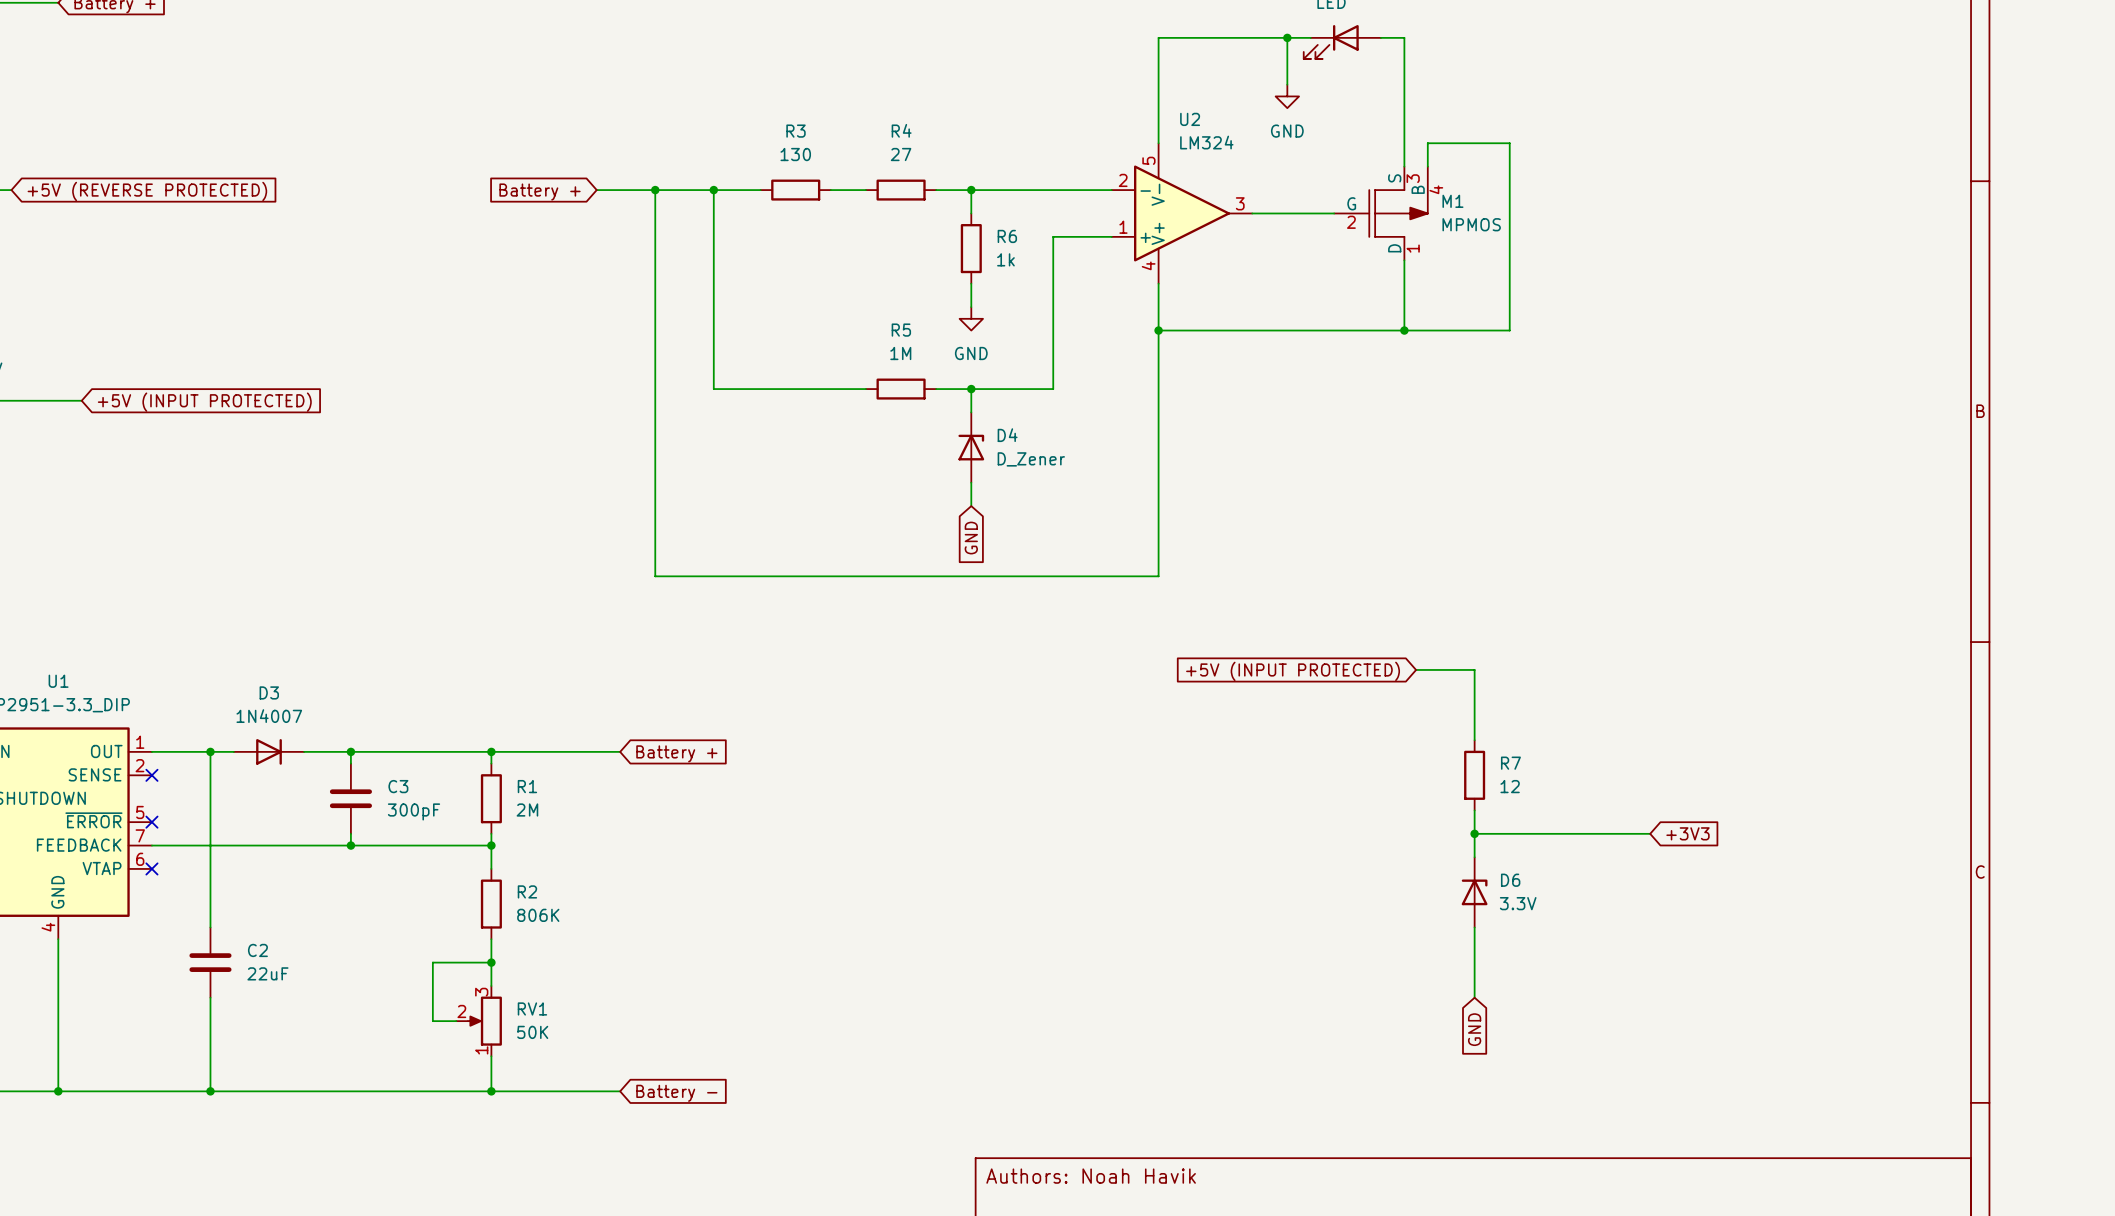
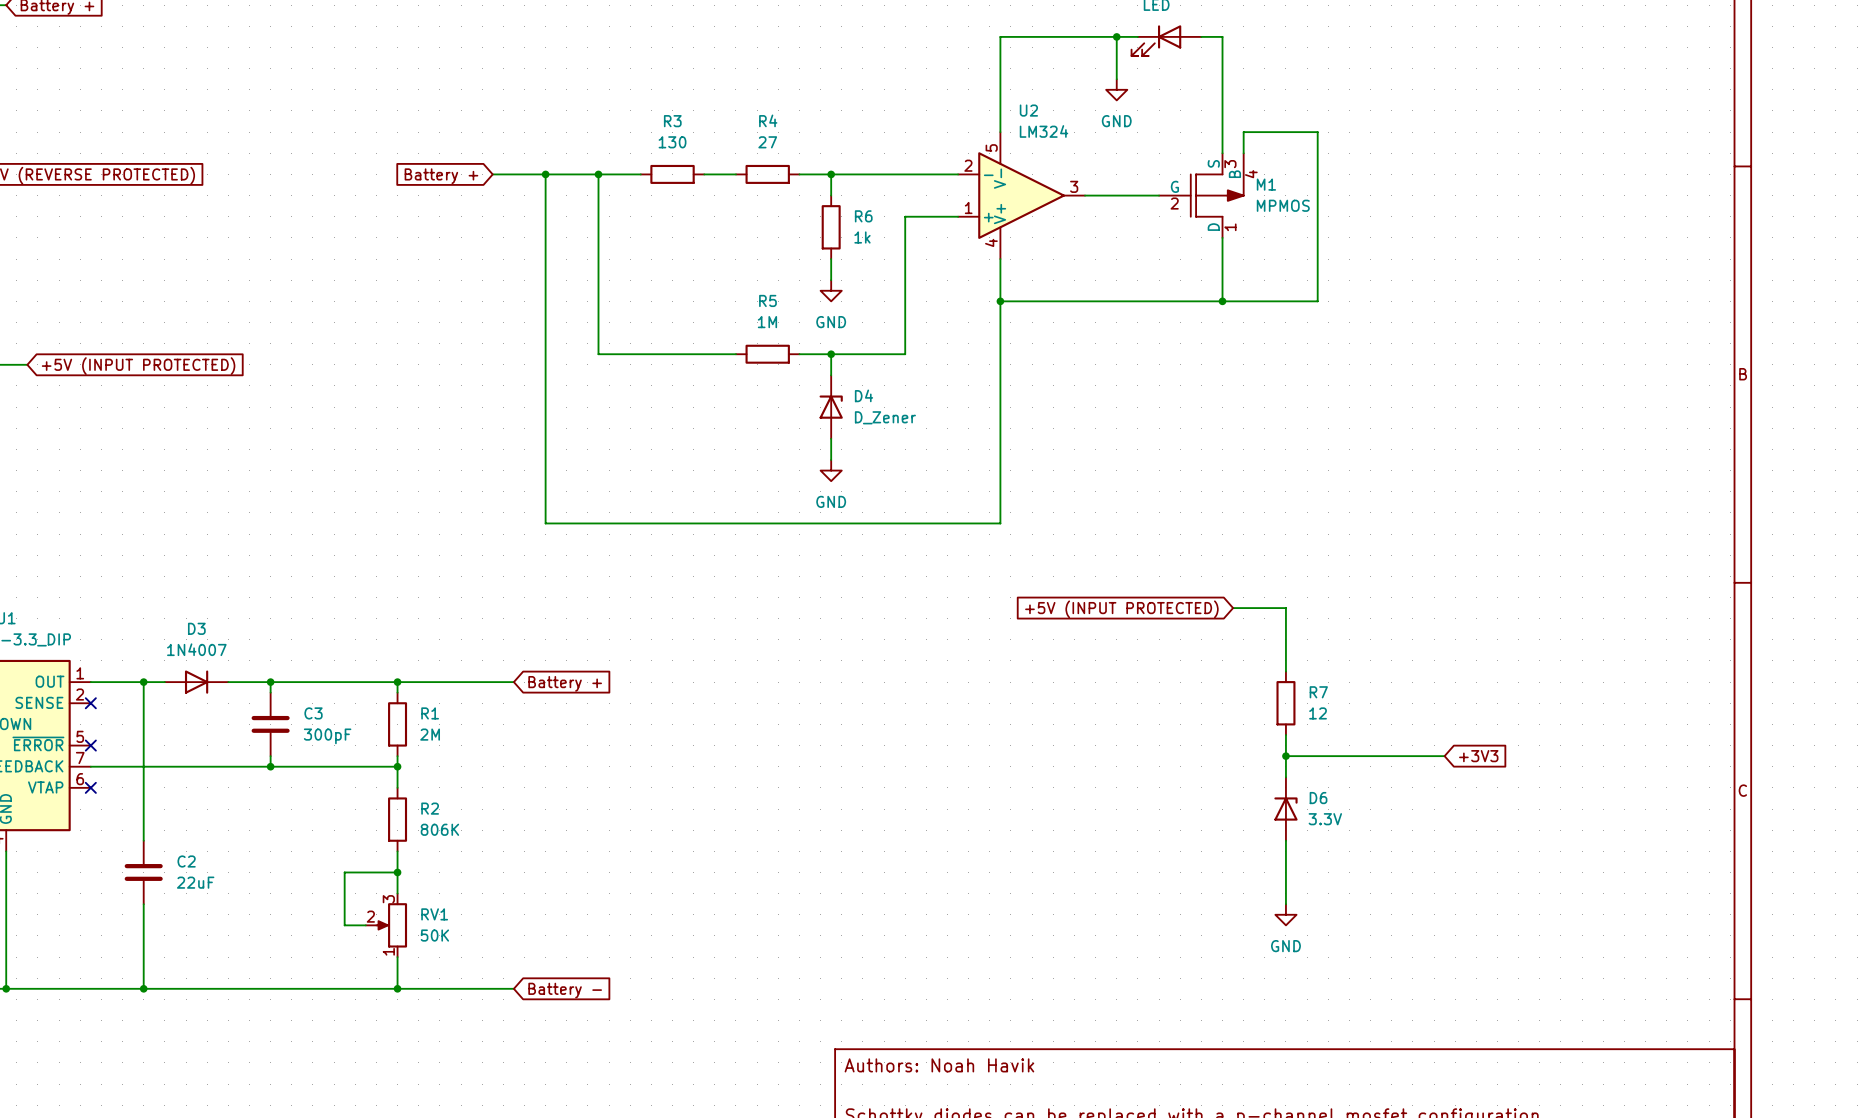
power symbol: none -> GND (831, 470)
global label: GND (971, 538) -> none
power symbol: none -> GND (1285, 914)
global label: GND (1474, 1029) -> none

